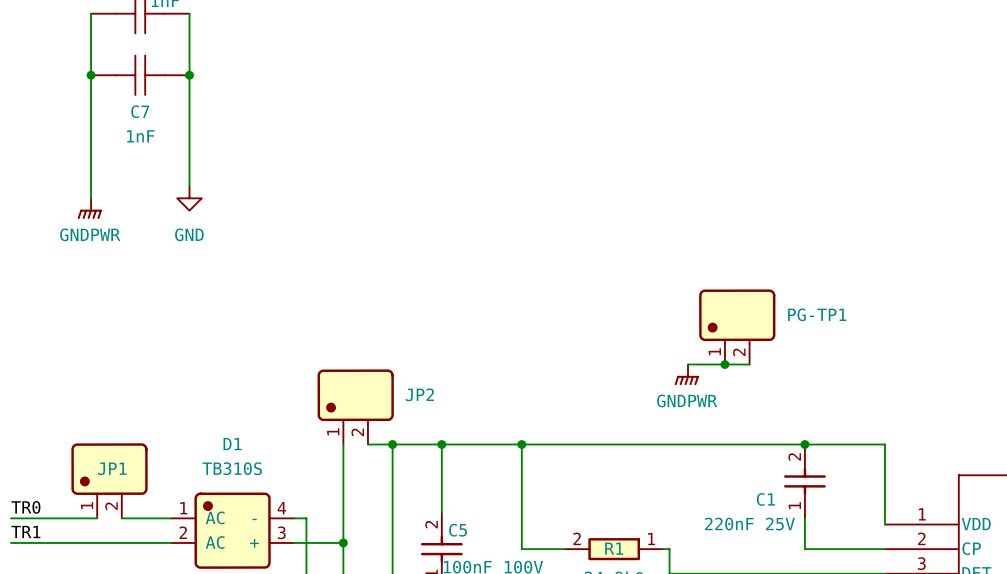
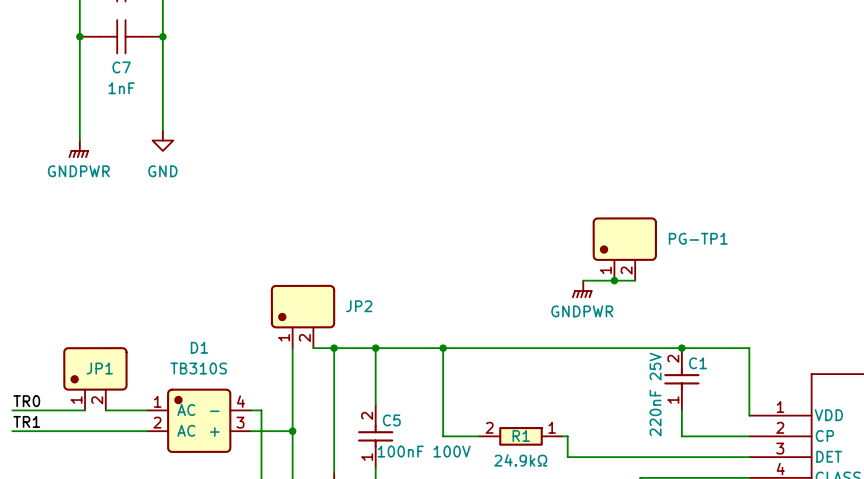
C1 name position: C1 (765, 499) -> C1 (698, 363)
C1 value rotation: 0° (749, 524) -> 90° counterclockwise (655, 394)

